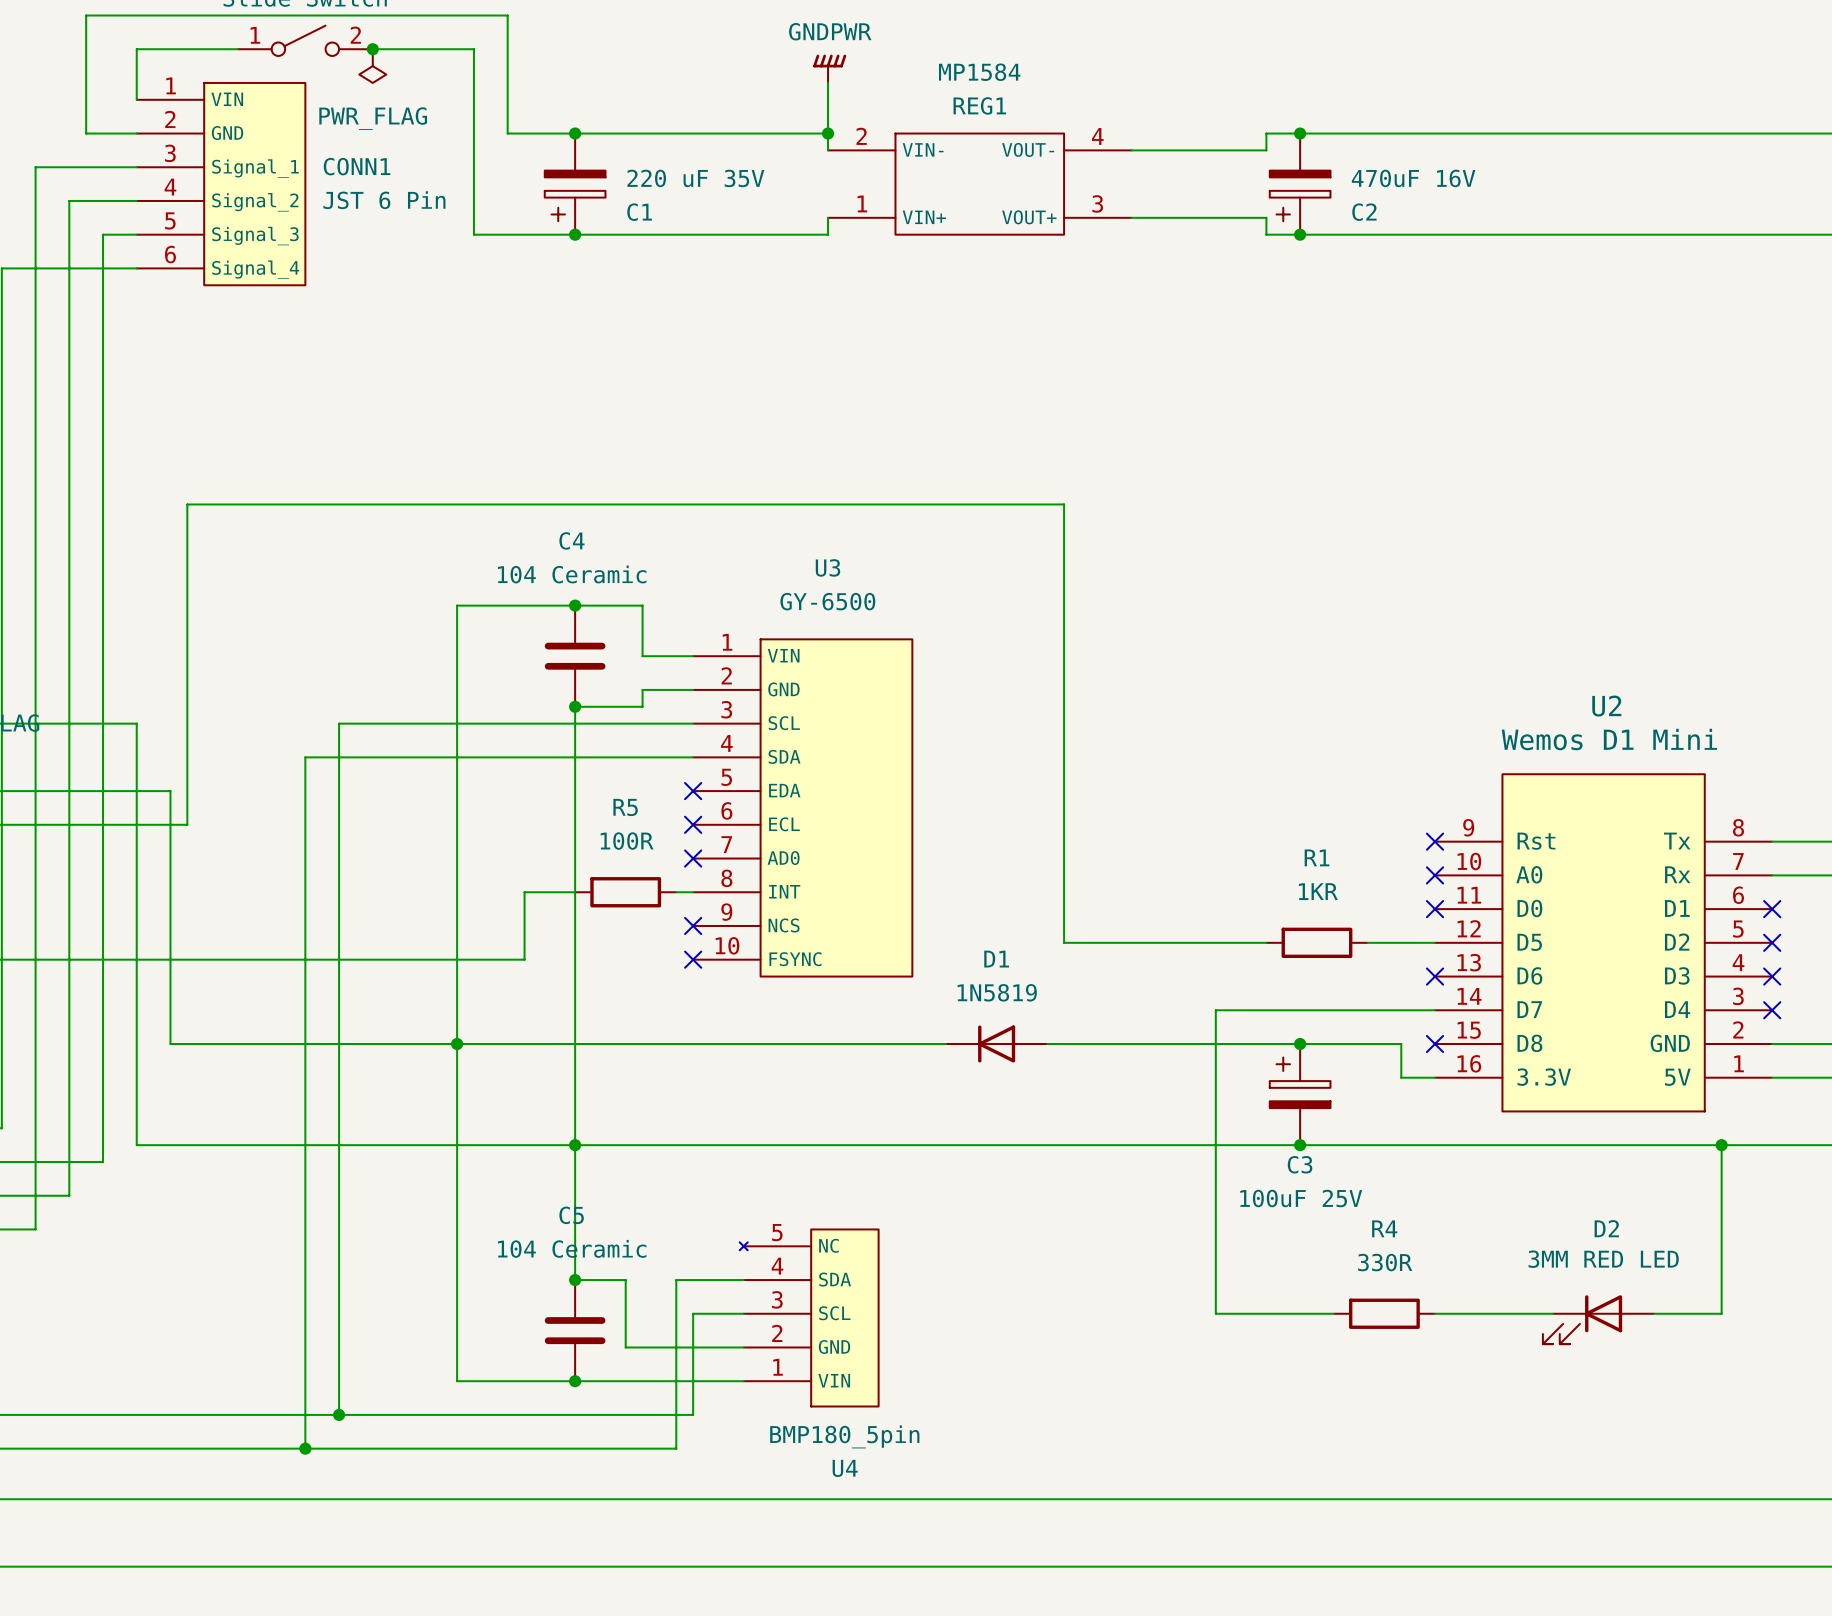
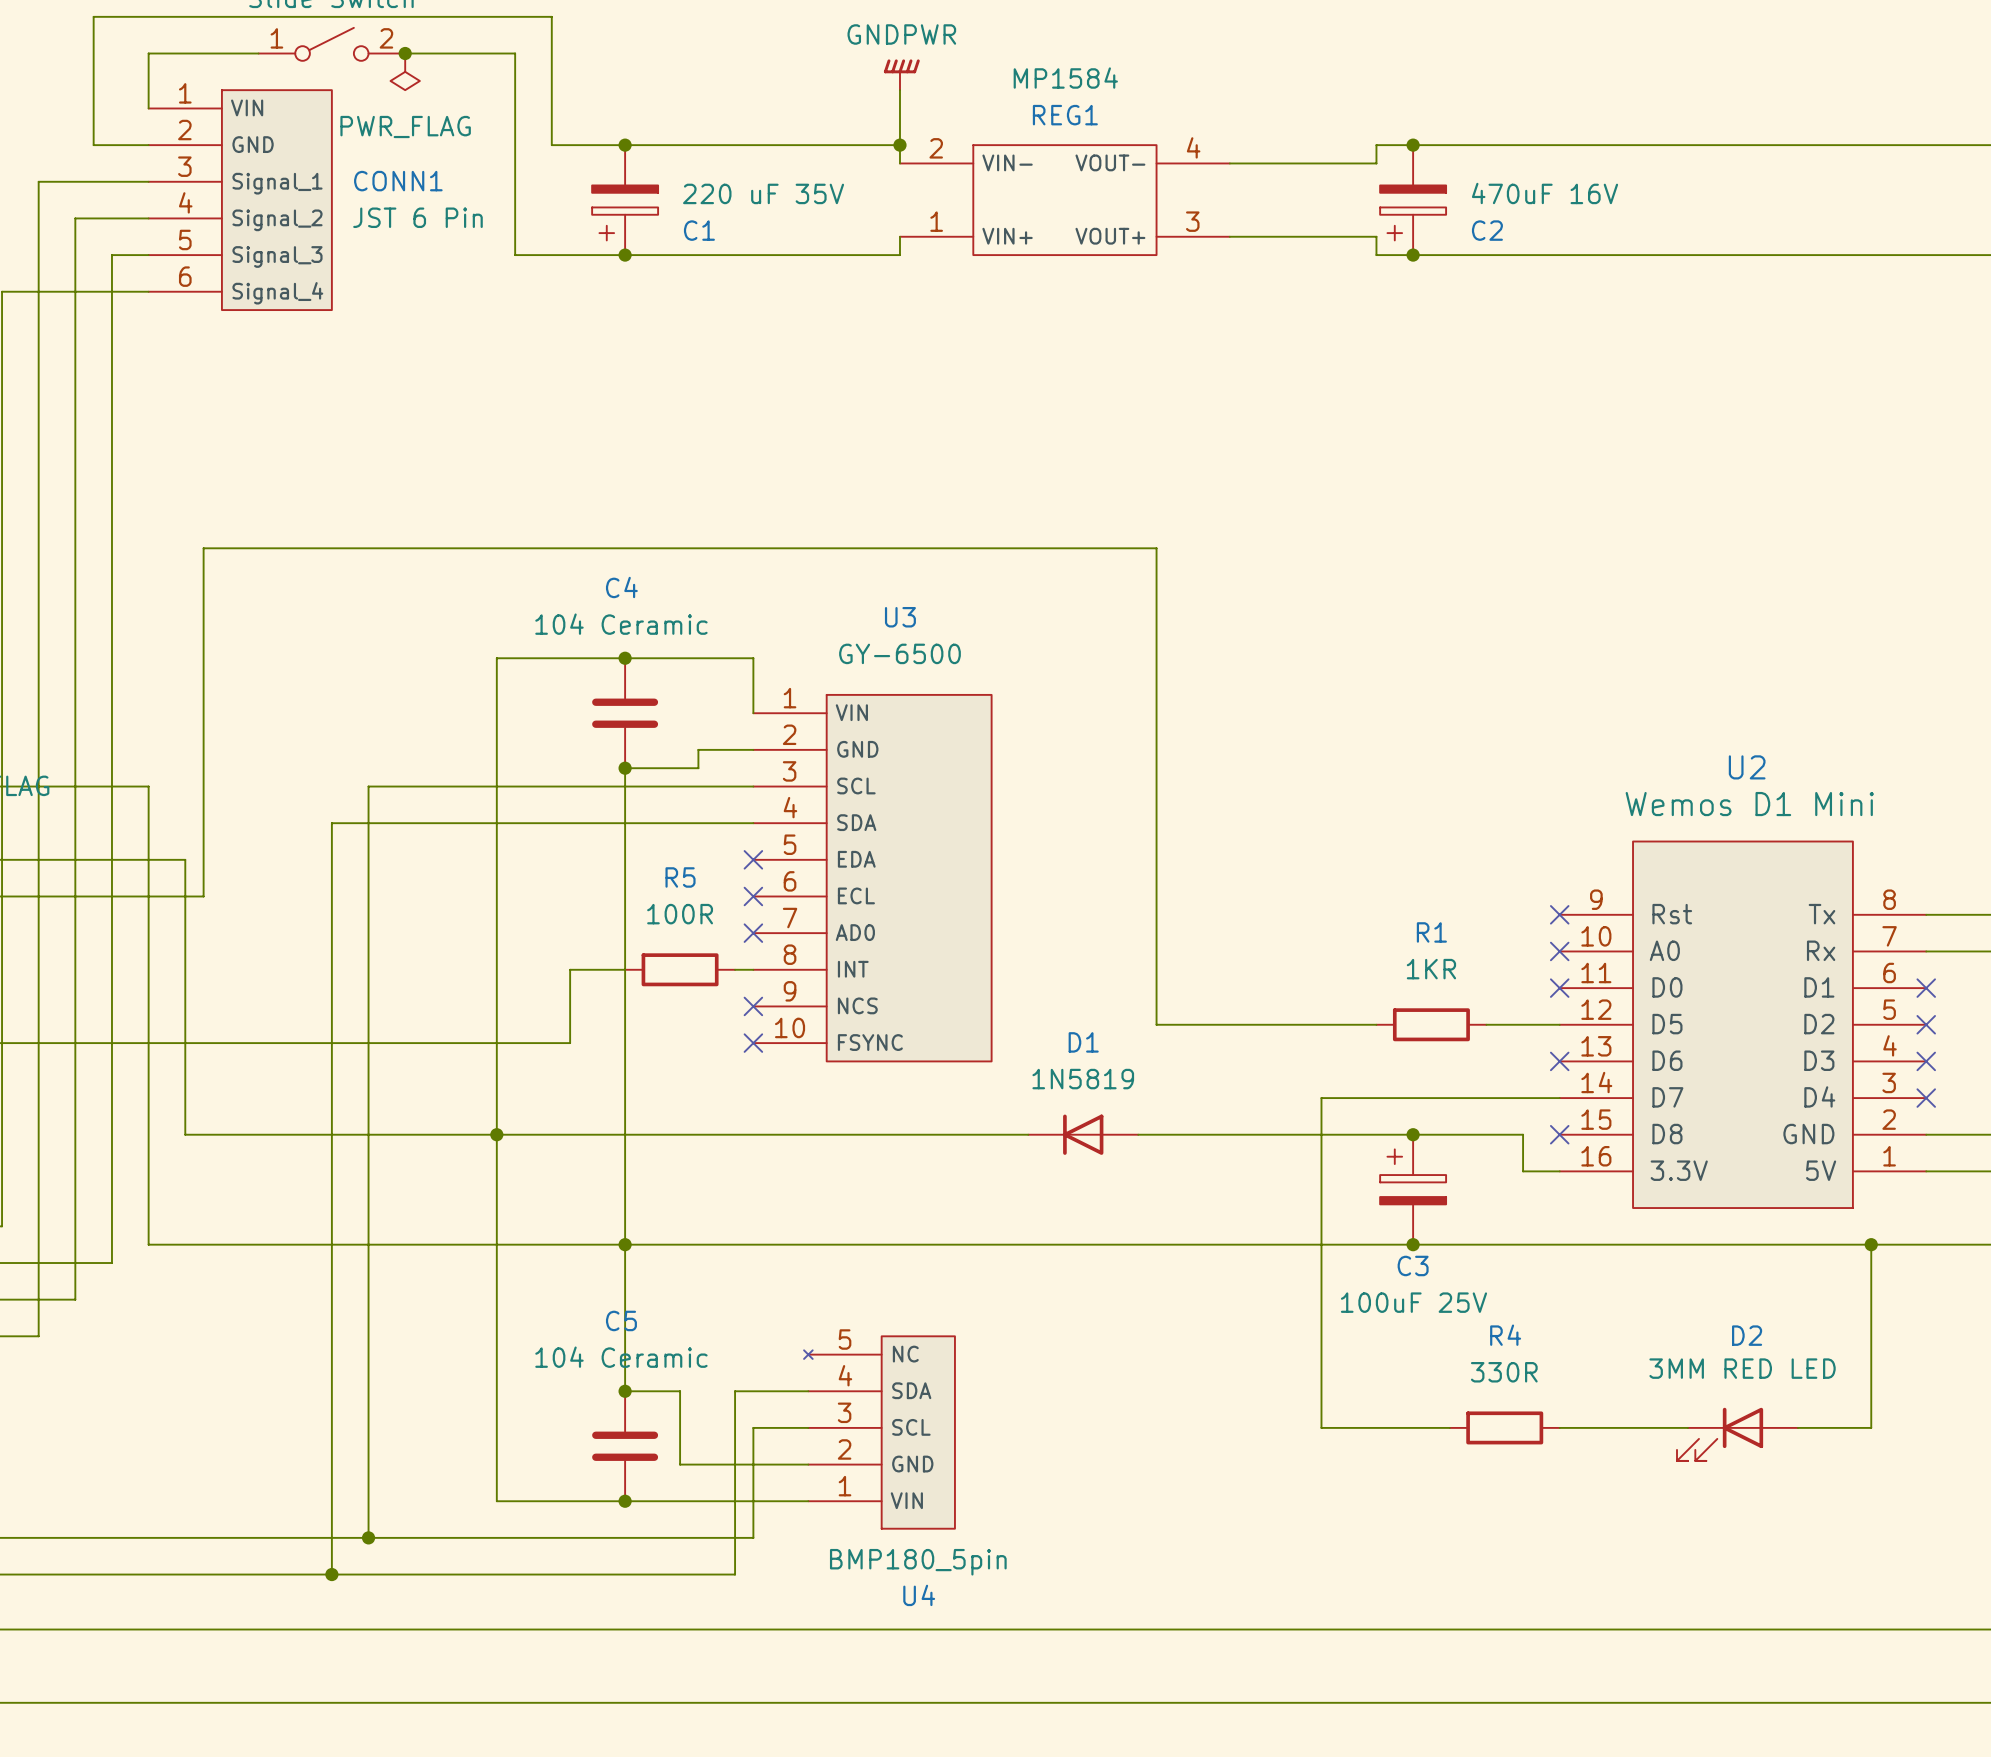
wire: (642, 605) (642, 656) (693, 656) -> (698, 658) (753, 658) (753, 713)

